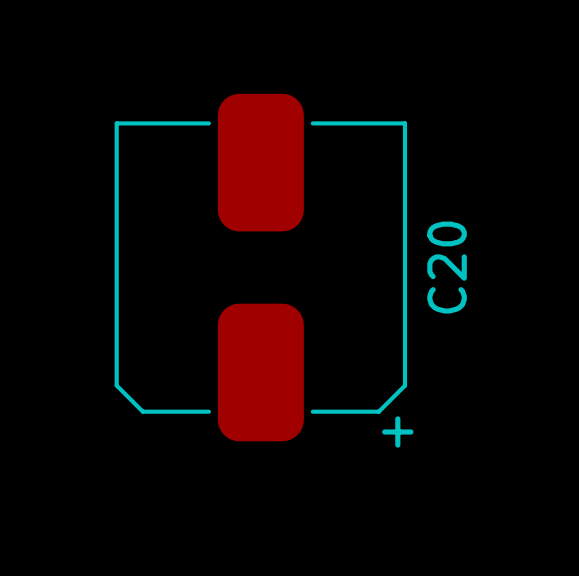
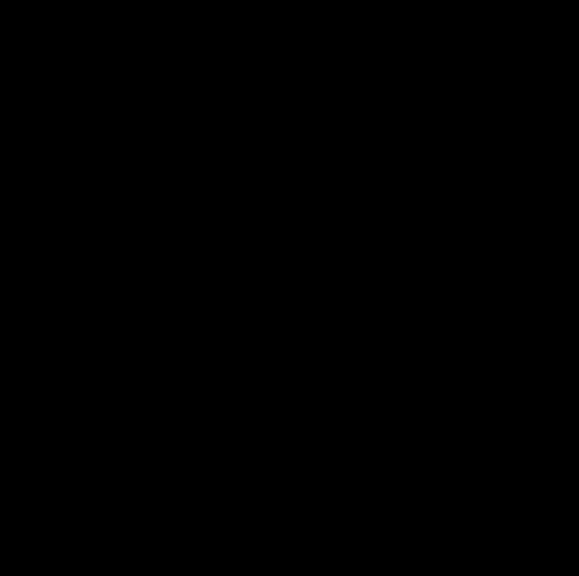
C20: (260, 267) -> none

